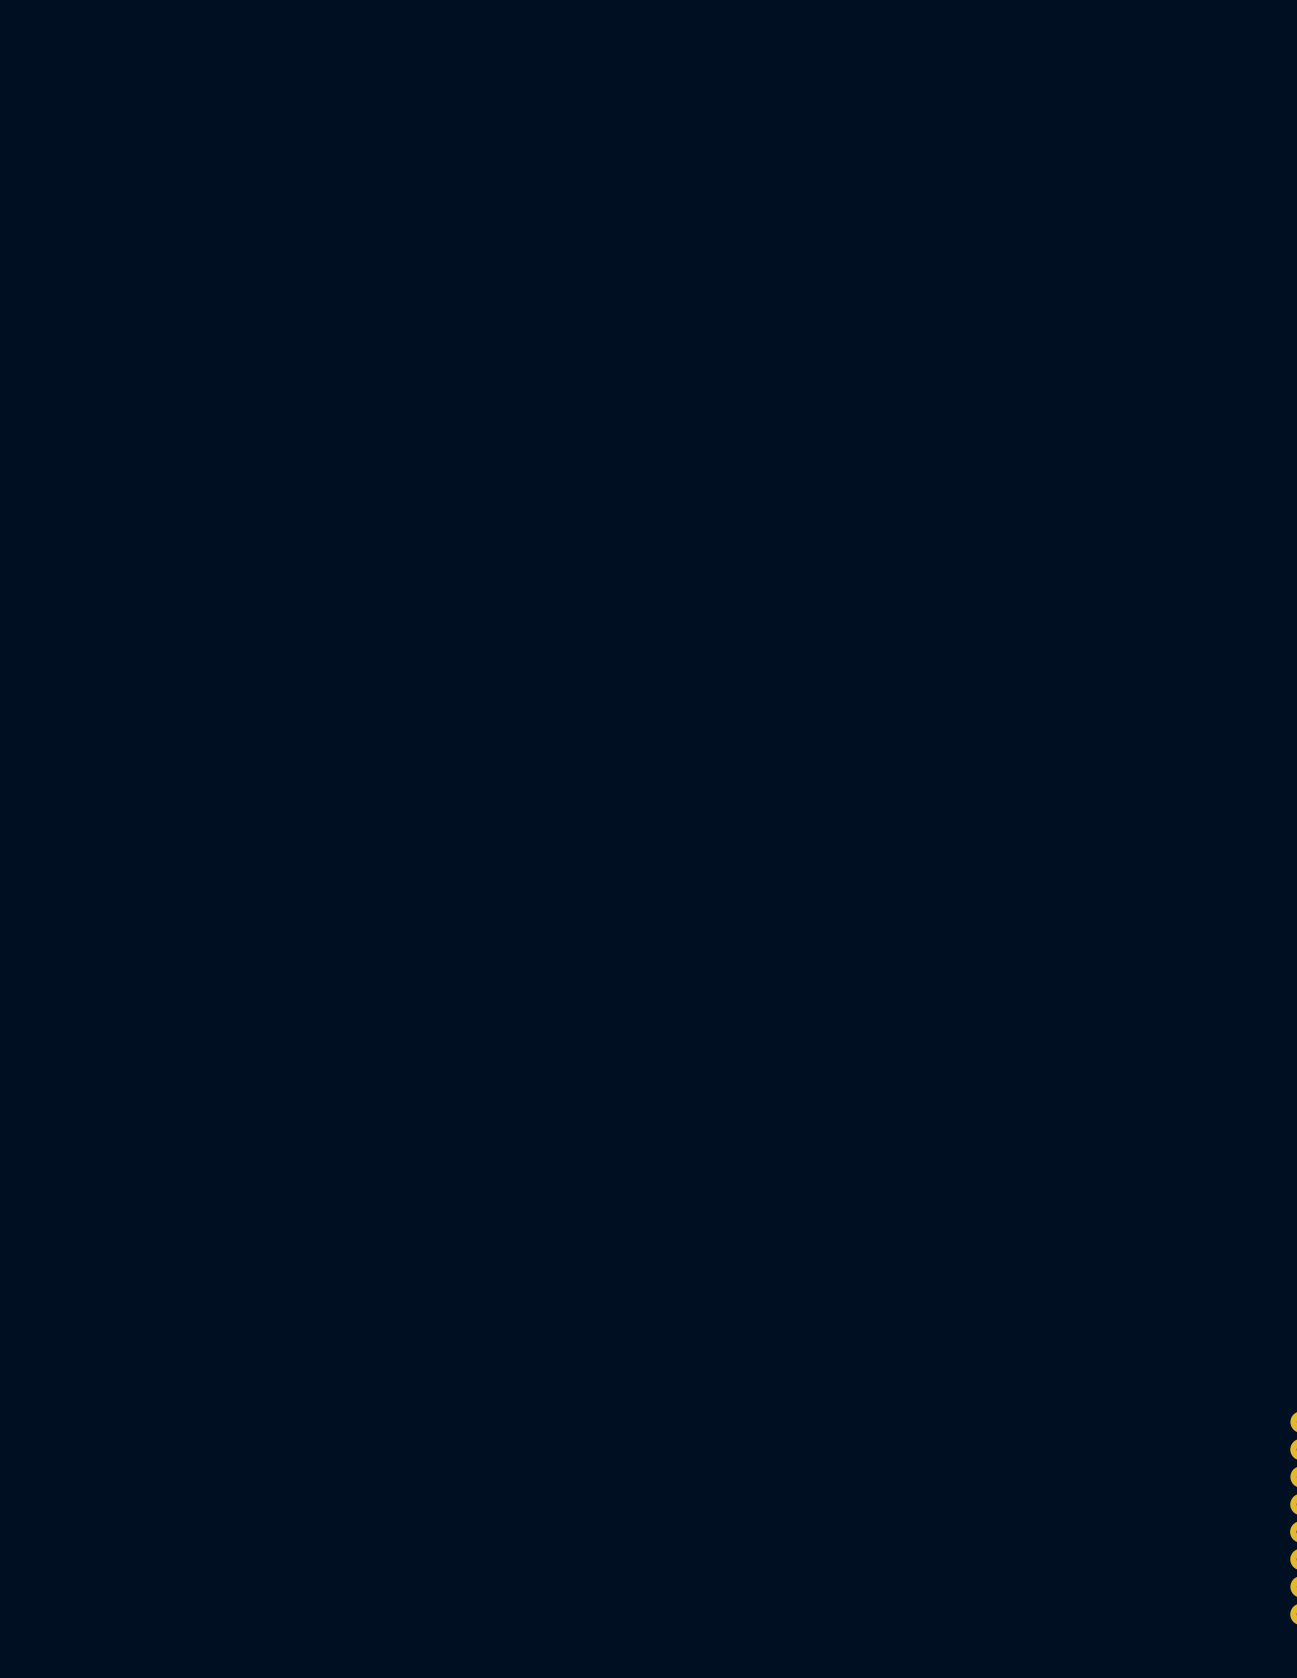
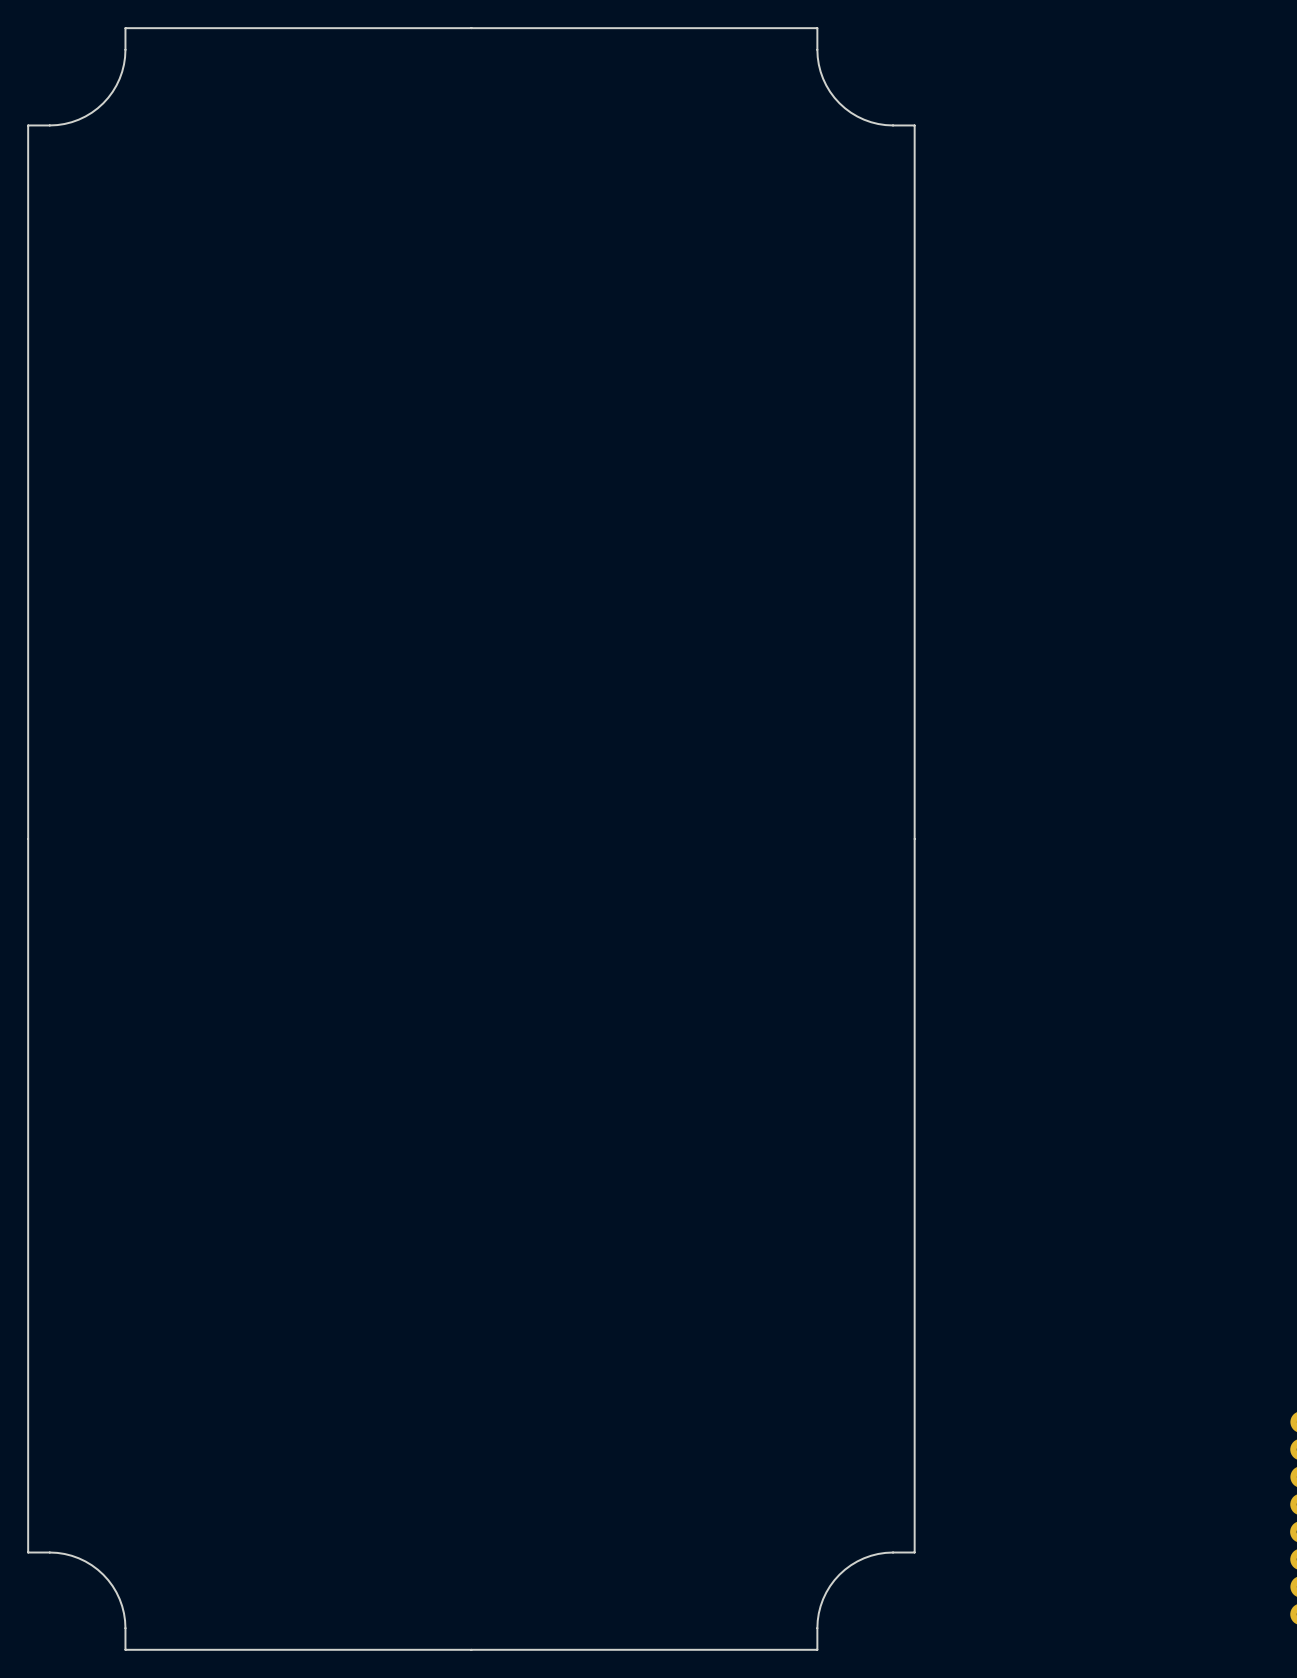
board edge: none -> (817, 28) (817, 57) (820, 71) (830, 91) (839, 103) (857, 116) (871, 122) (885, 125) (914, 125) (914, 1552) (885, 1552) (871, 1555) (850, 1565) (839, 1574) (826, 1592) (820, 1606) (817, 1620) (817, 1649) (125, 1649) (125, 1620) (122, 1606) (116, 1592) (103, 1574) (85, 1561) (71, 1555) (57, 1552) (28, 1552) (28, 125) (57, 125) (71, 122) (91, 112) (103, 103) (116, 85) (122, 71) (125, 57) (125, 28) (817, 28)

